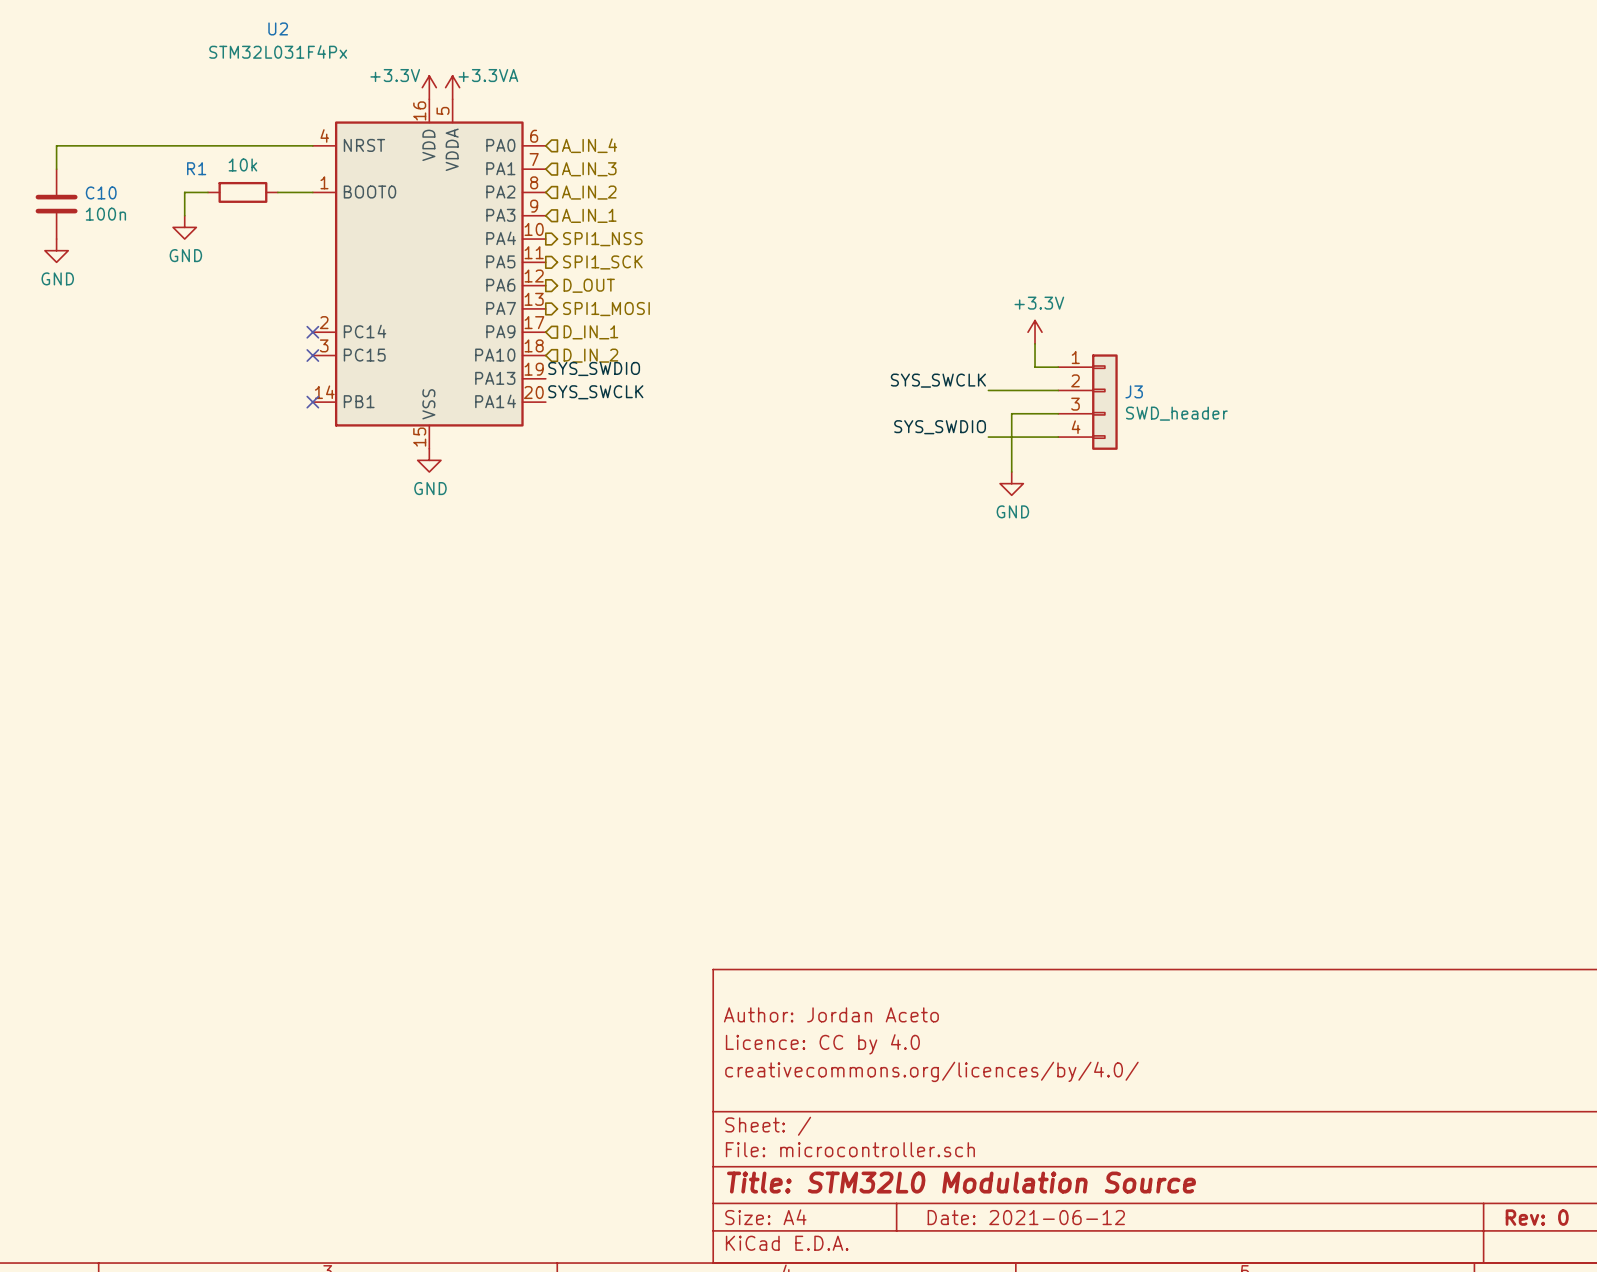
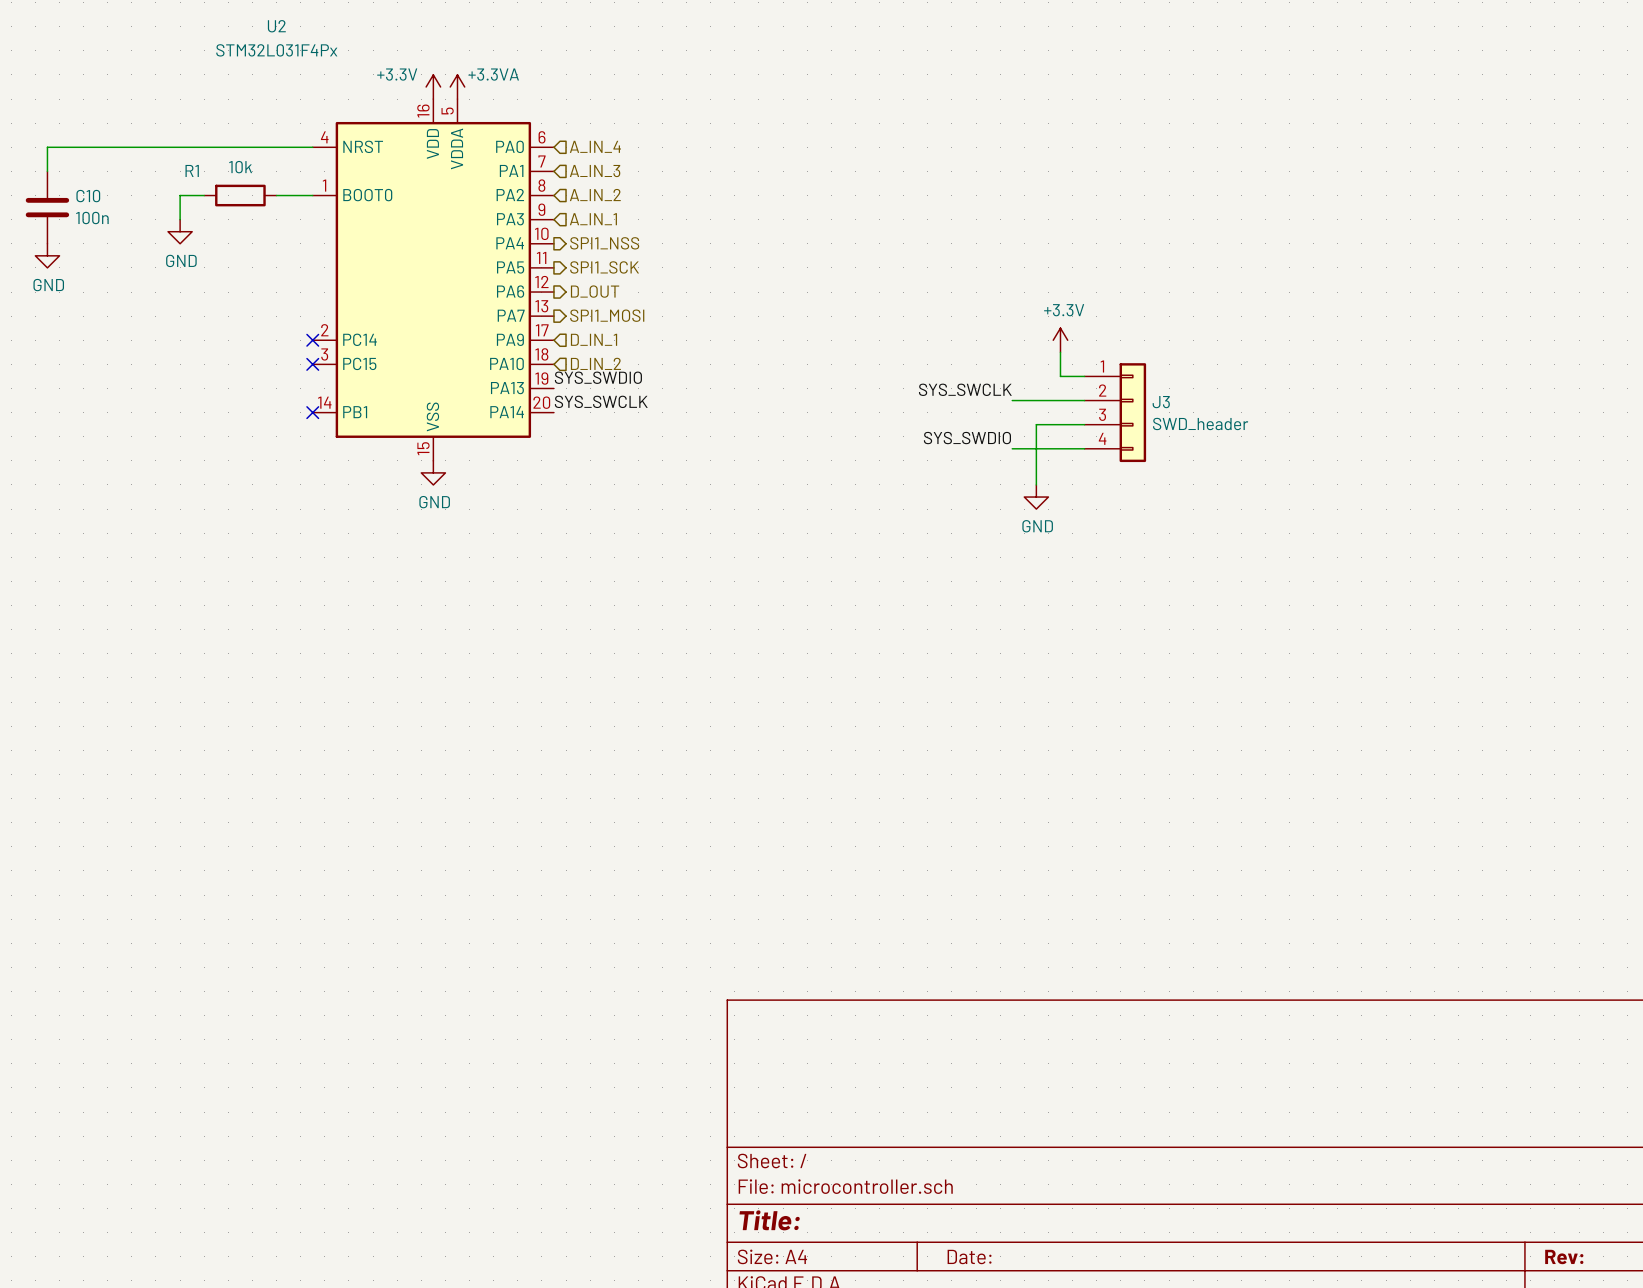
title block: Author: Jordan Aceto (831, 1014) -> none
title block: Licence: CC by 4.0 (822, 1044) -> none
title block: creativecommons.org/licences/by/4.0/ (931, 1071) -> none
title block: Title: STM32L0 Modulation Source (961, 1182) -> Title: (769, 1220)
title block: Date: 2021-06-12 (1026, 1217) -> Date: (969, 1257)
title block: Rev: 0 (1537, 1217) -> Rev: (1564, 1257)

